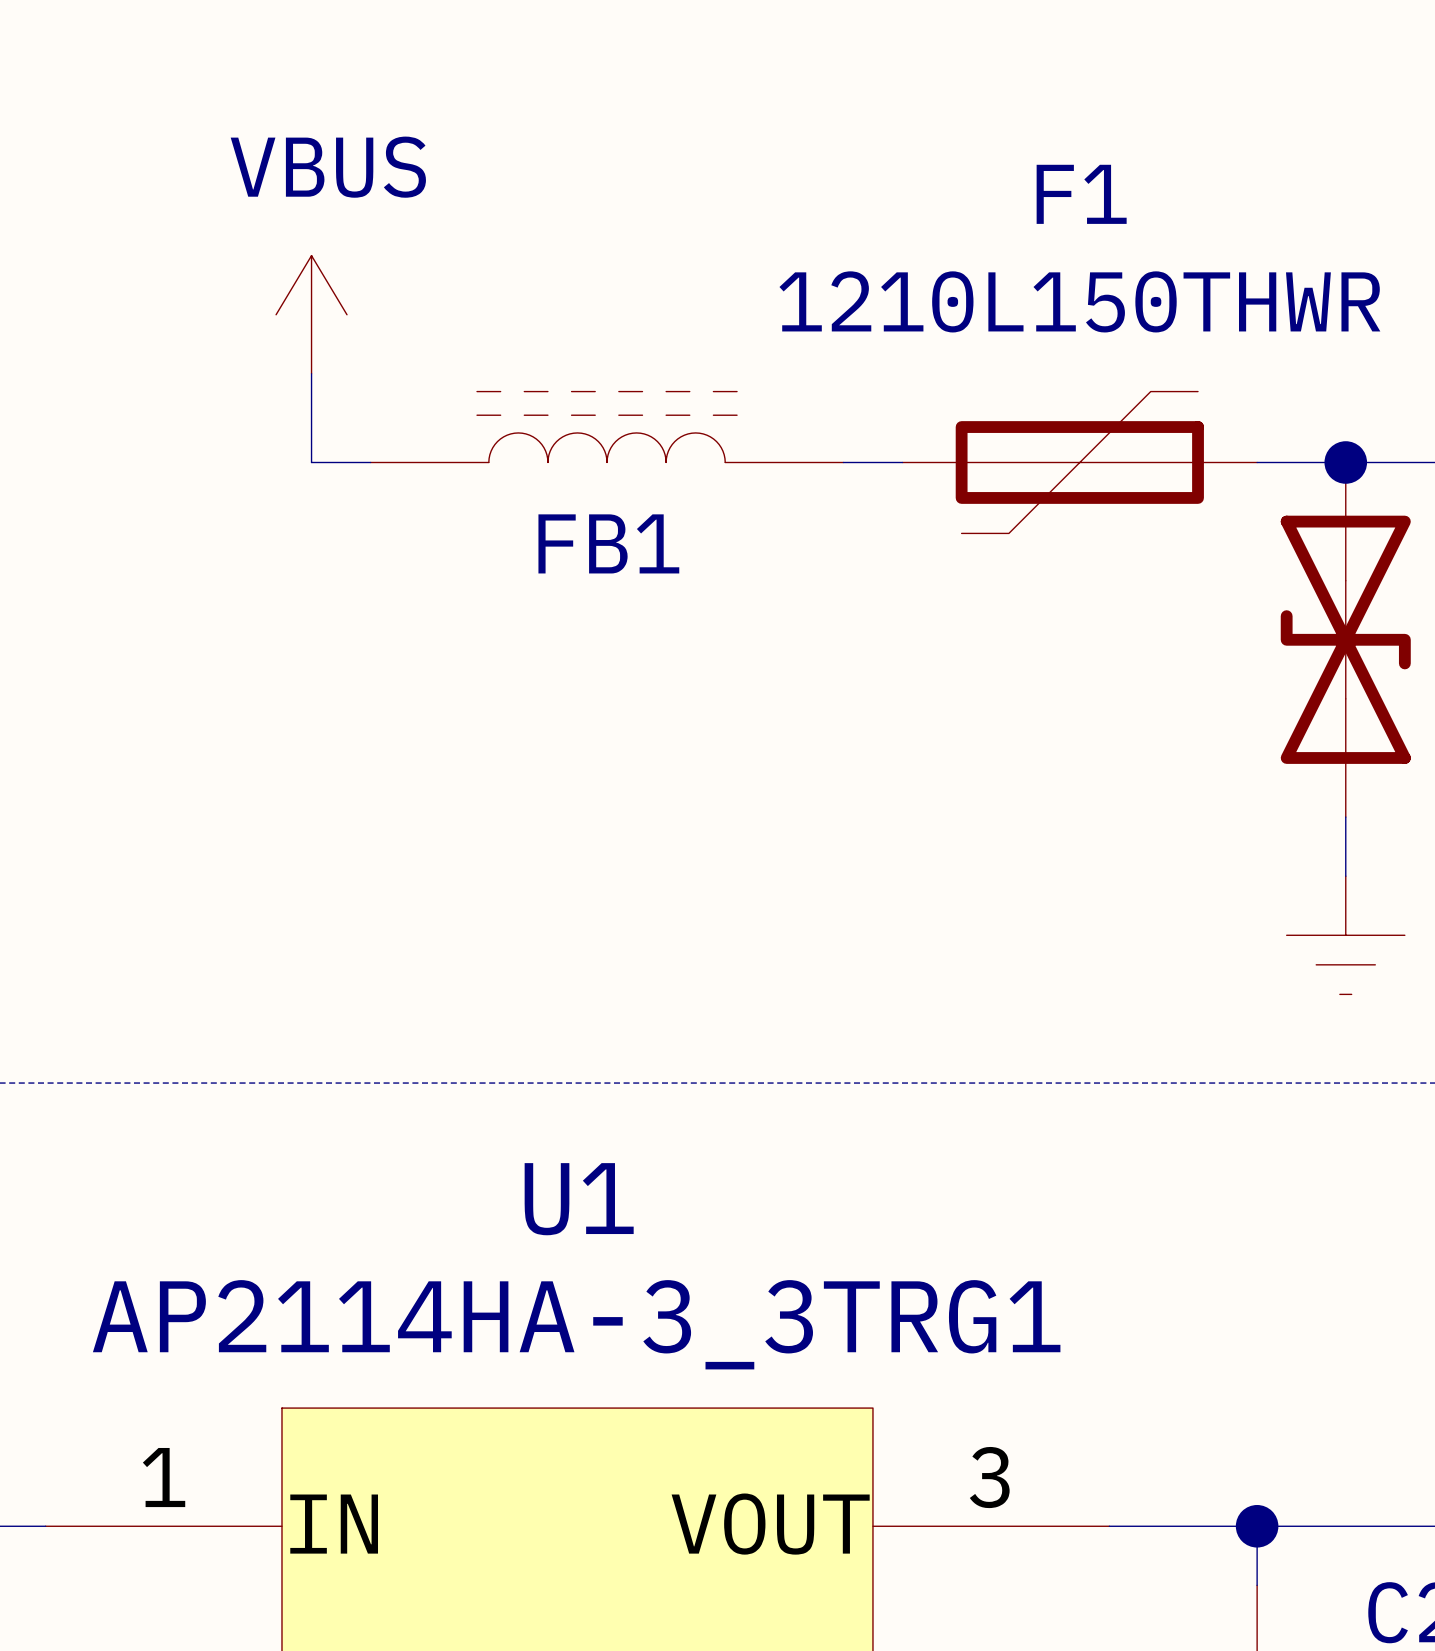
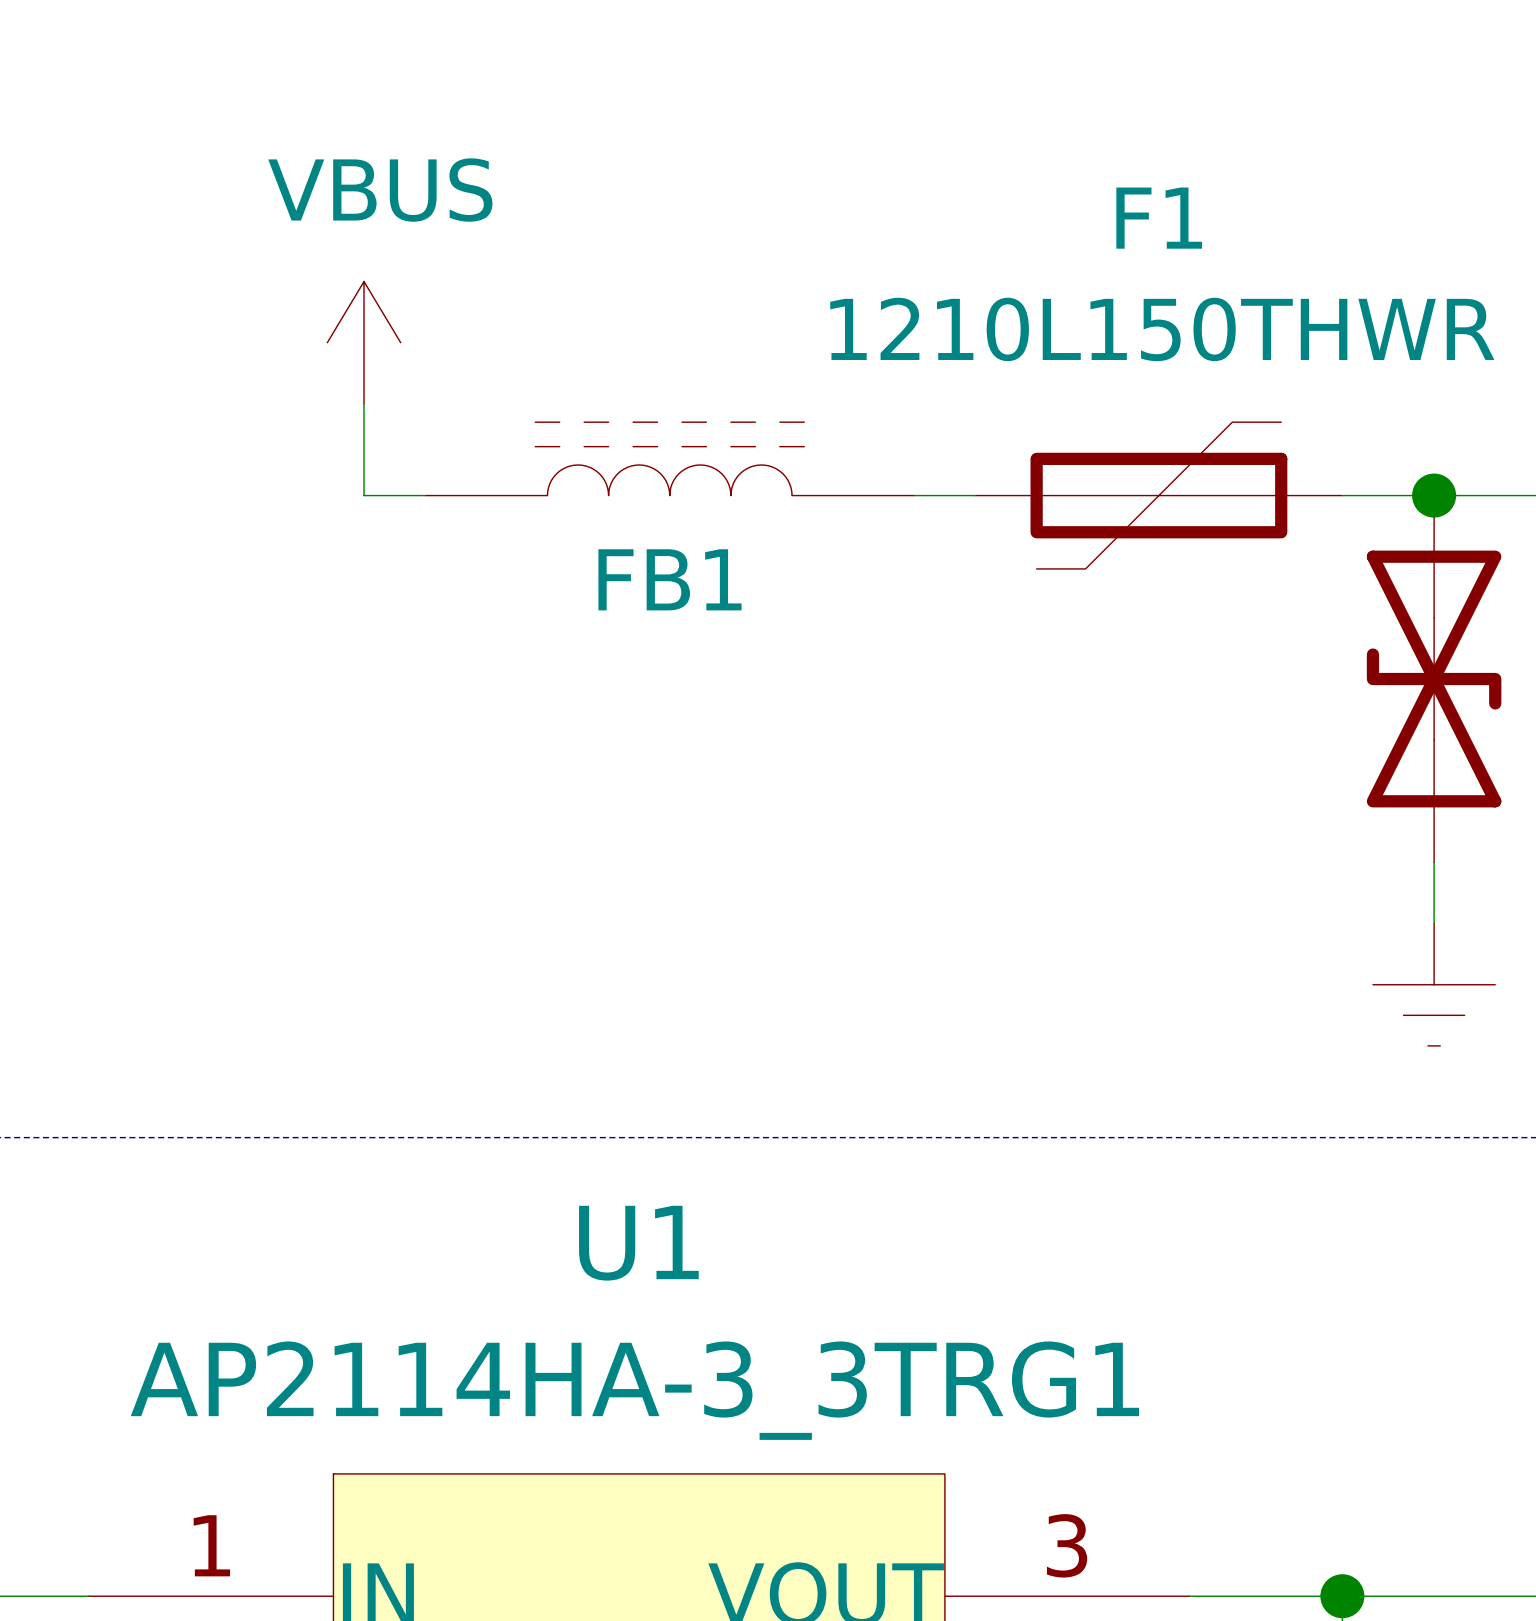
U1 name position: U1 (579, 1199) -> U1 (638, 1243)

